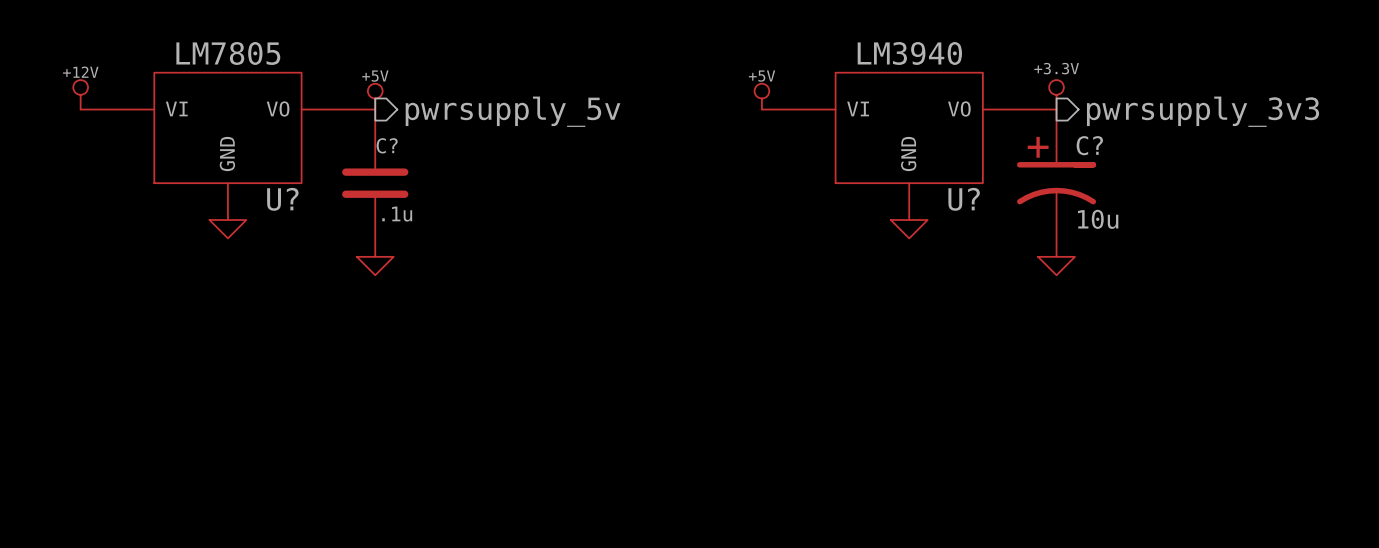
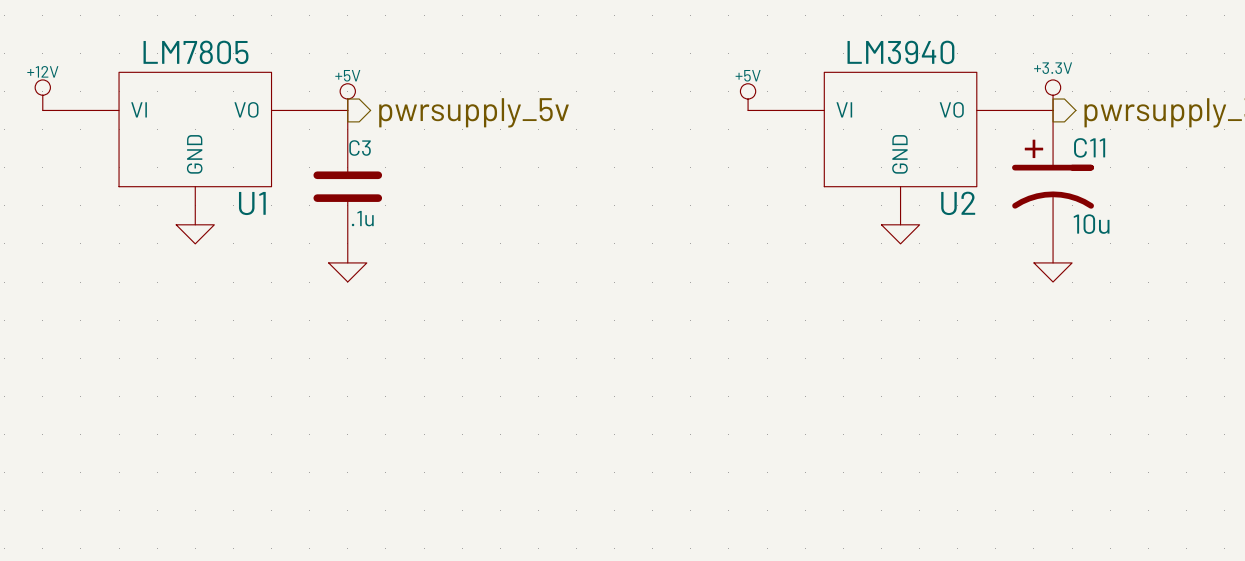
C? name: C? (387, 145) -> C3 (360, 148)
C? name: C? (1089, 145) -> C11 (1089, 147)
U? name: U? (282, 199) -> U1 (252, 203)
U? name: U? (964, 199) -> U2 (958, 203)

